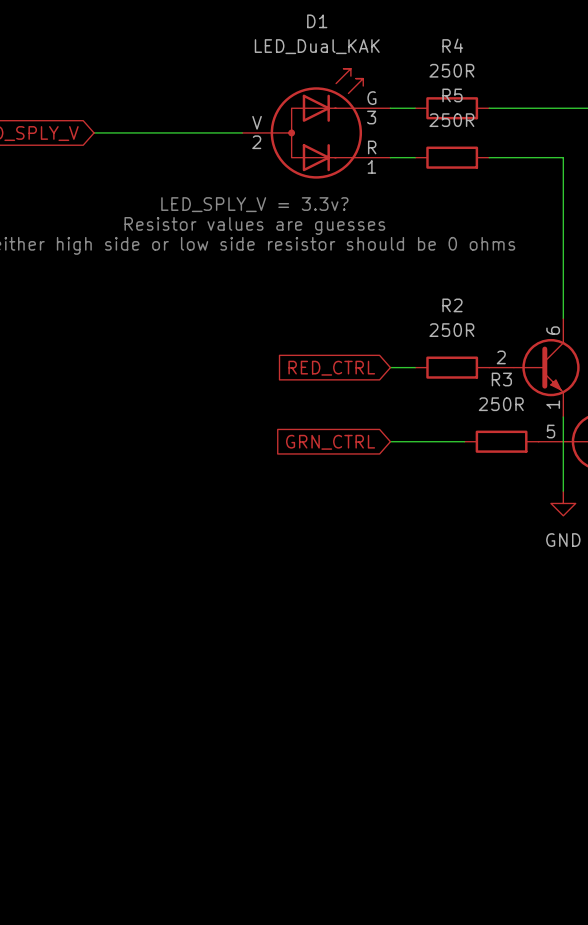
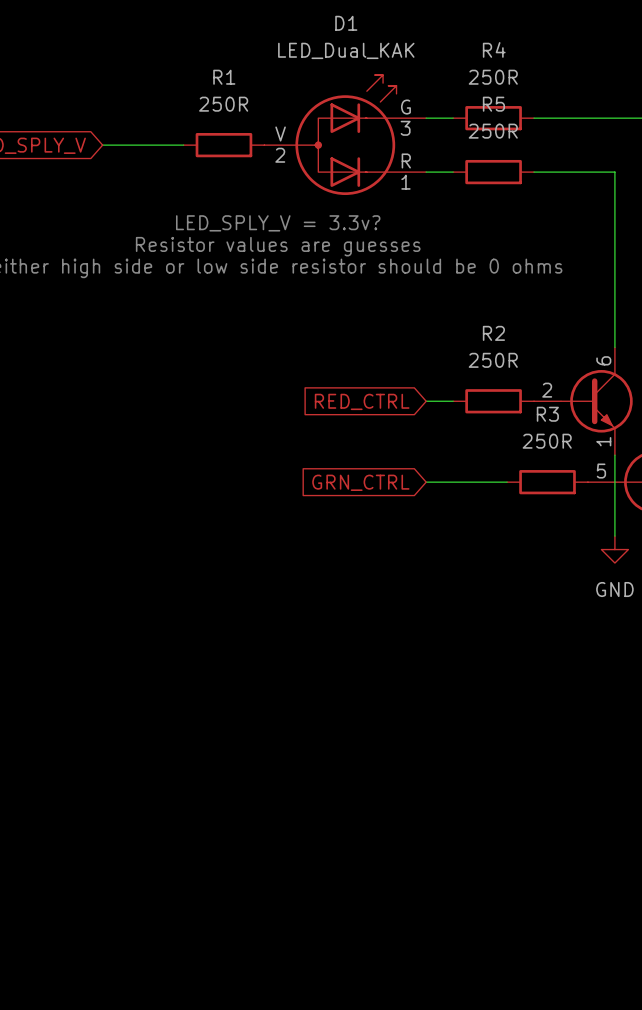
wire: (168, 132) (242, 132) -> none
R1: none -> 250R (223, 145)

